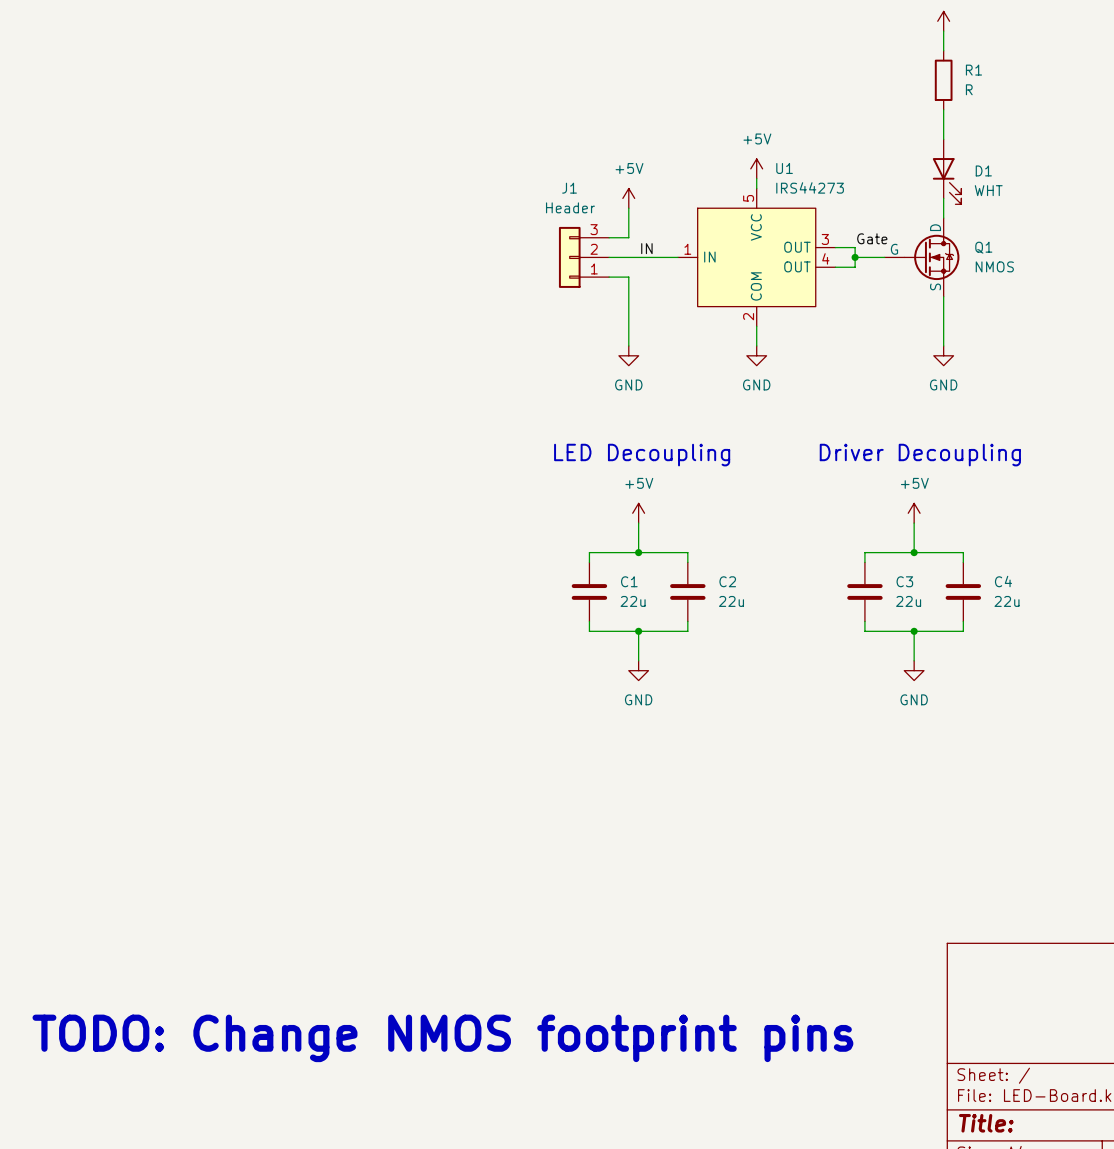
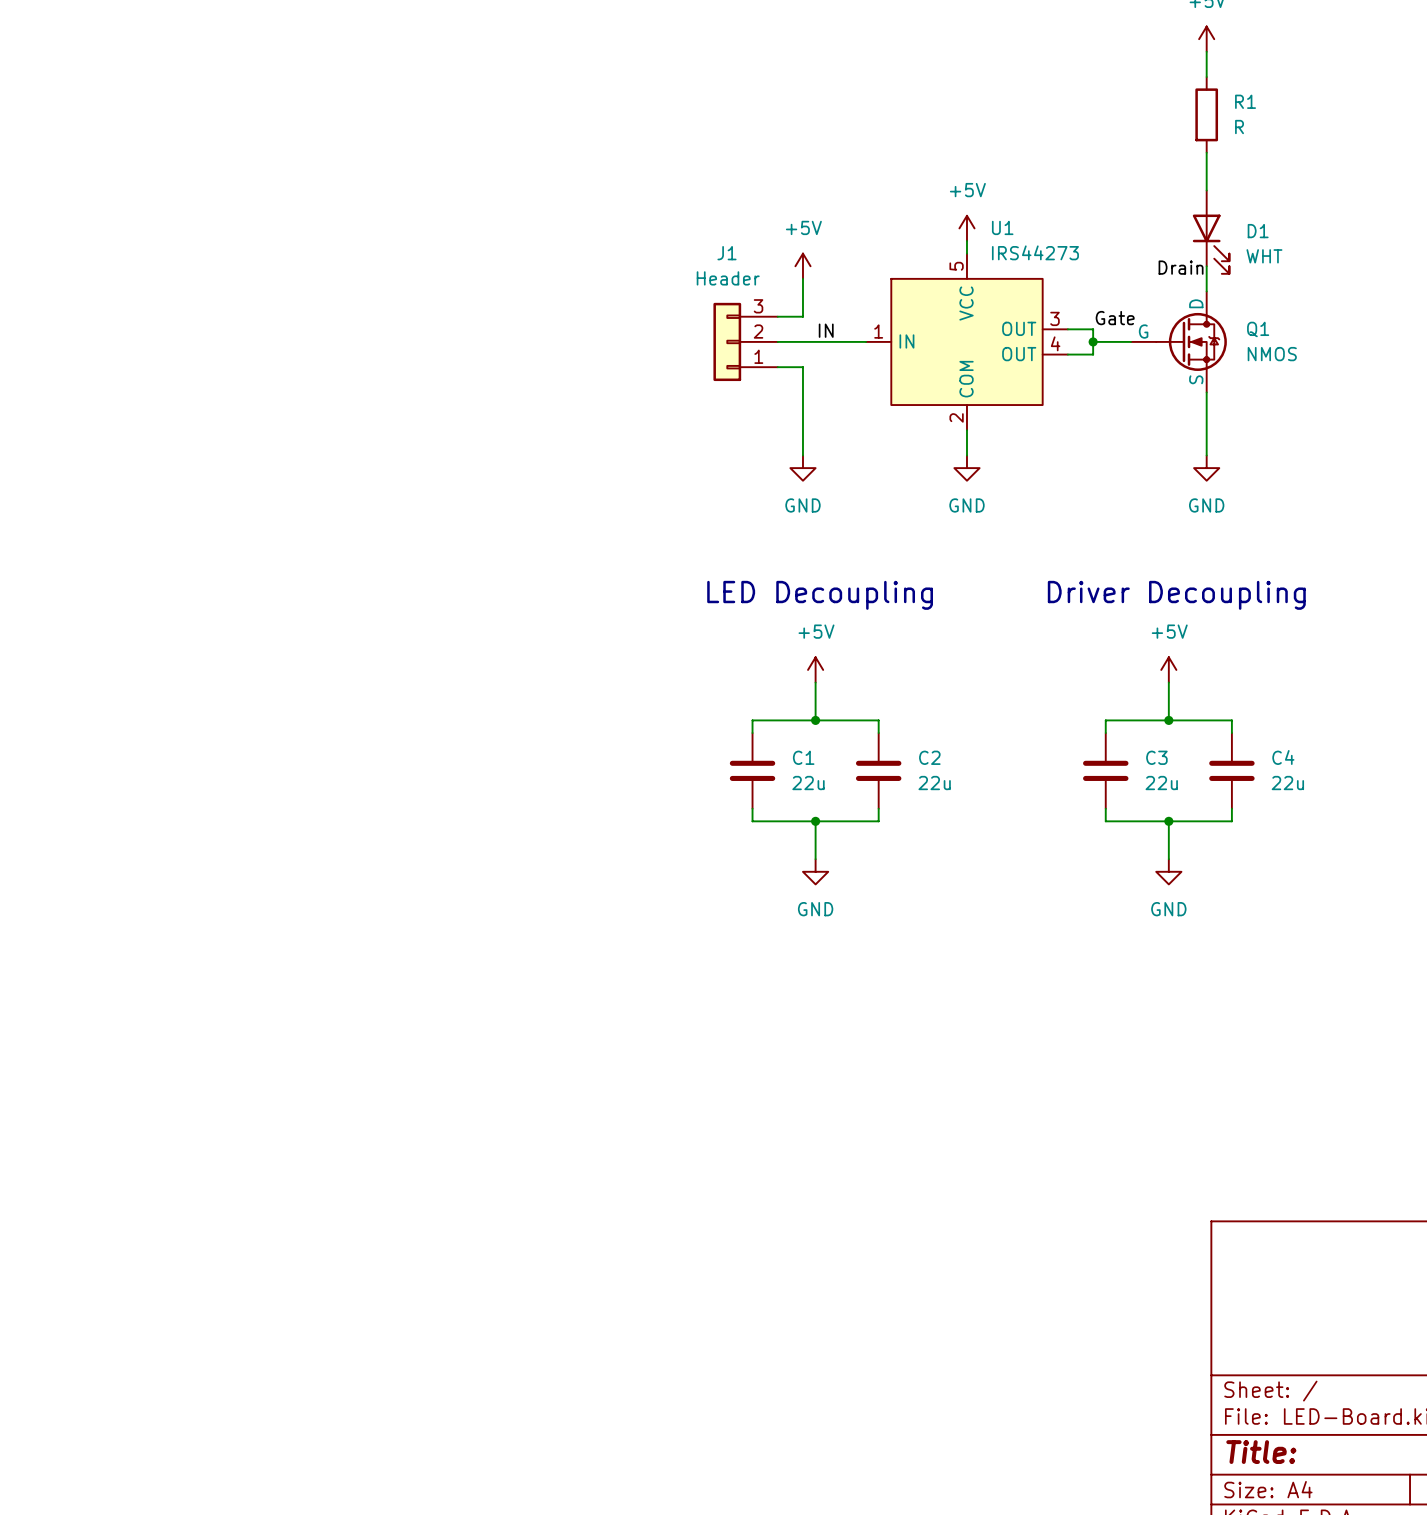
label: none -> Drain (1181, 267)
text: TODO: Change NMOS footprint pins (442, 1038) -> none

